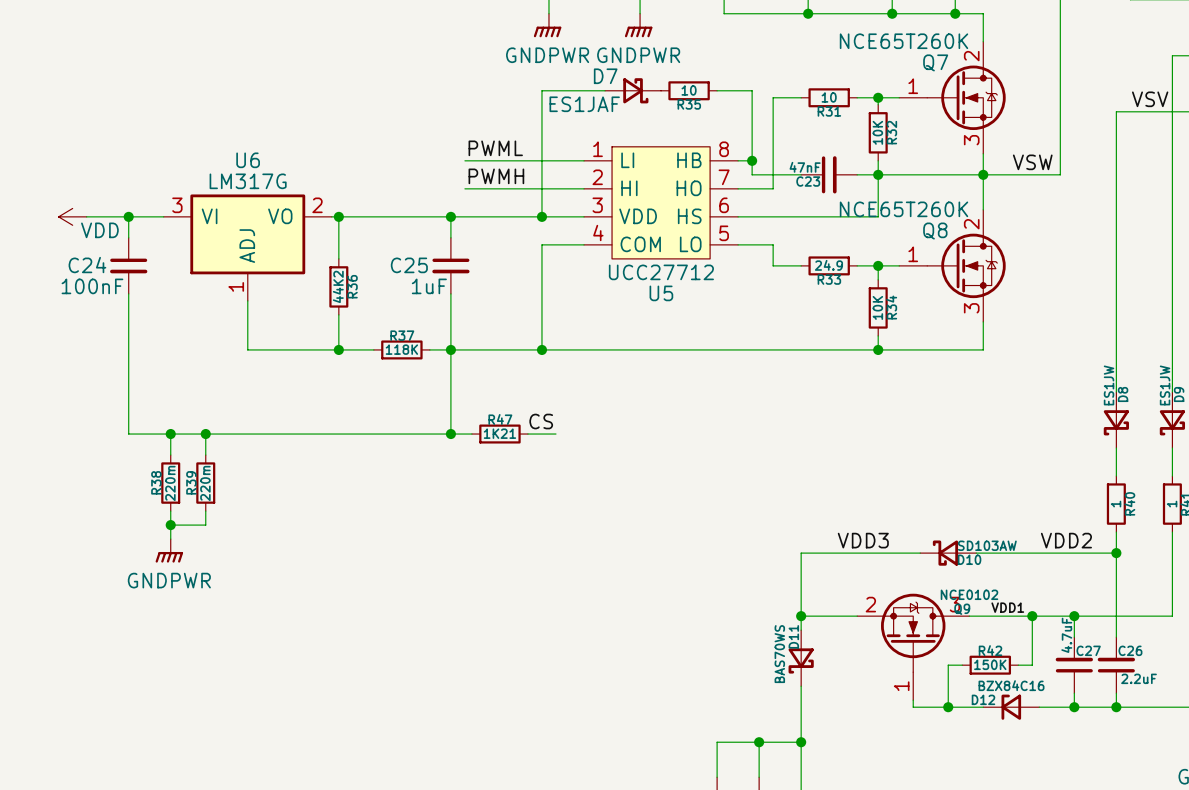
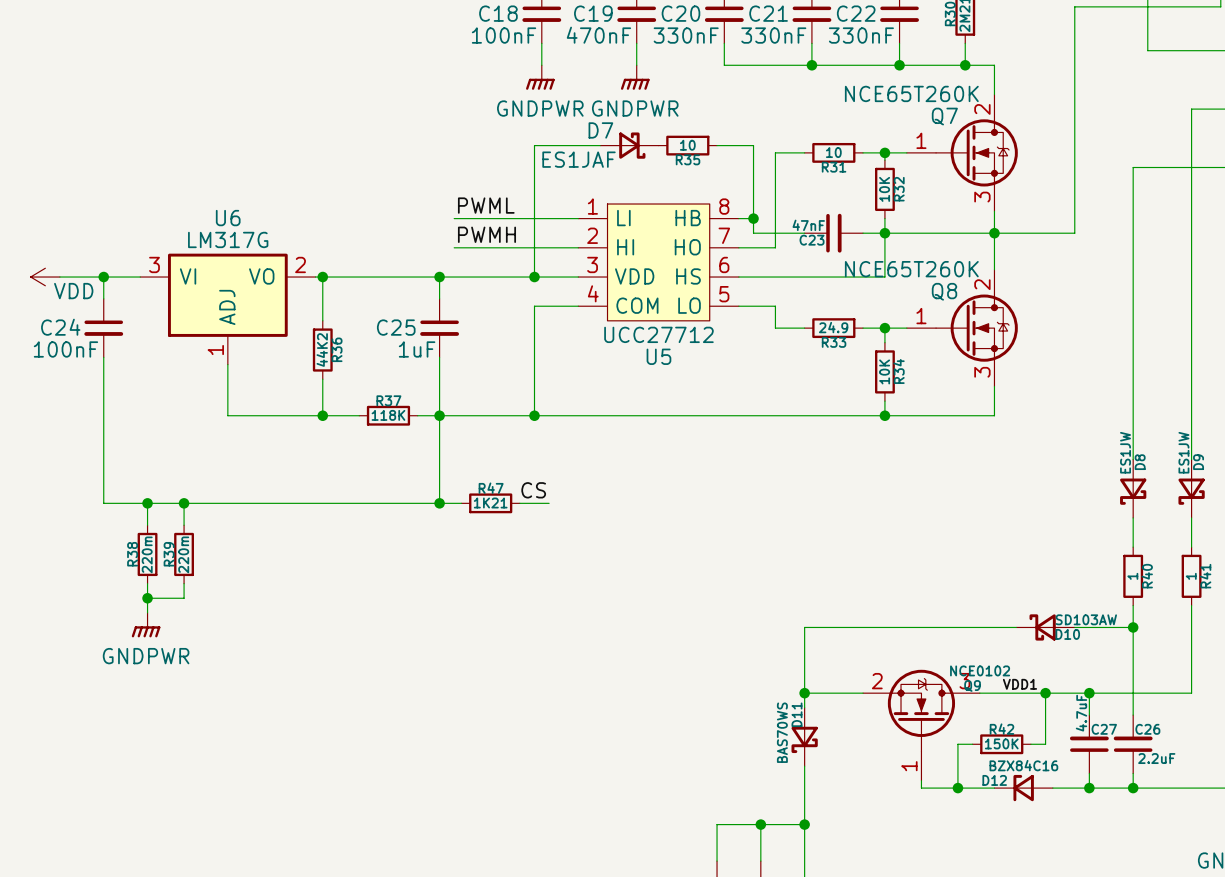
label: VSV (1150, 99) -> none
label: VSW (1032, 162) -> none
label: VDD3 (863, 540) -> none
label: VDD2 (1066, 540) -> none
D10 position: (948, 553) -> (1045, 627)

